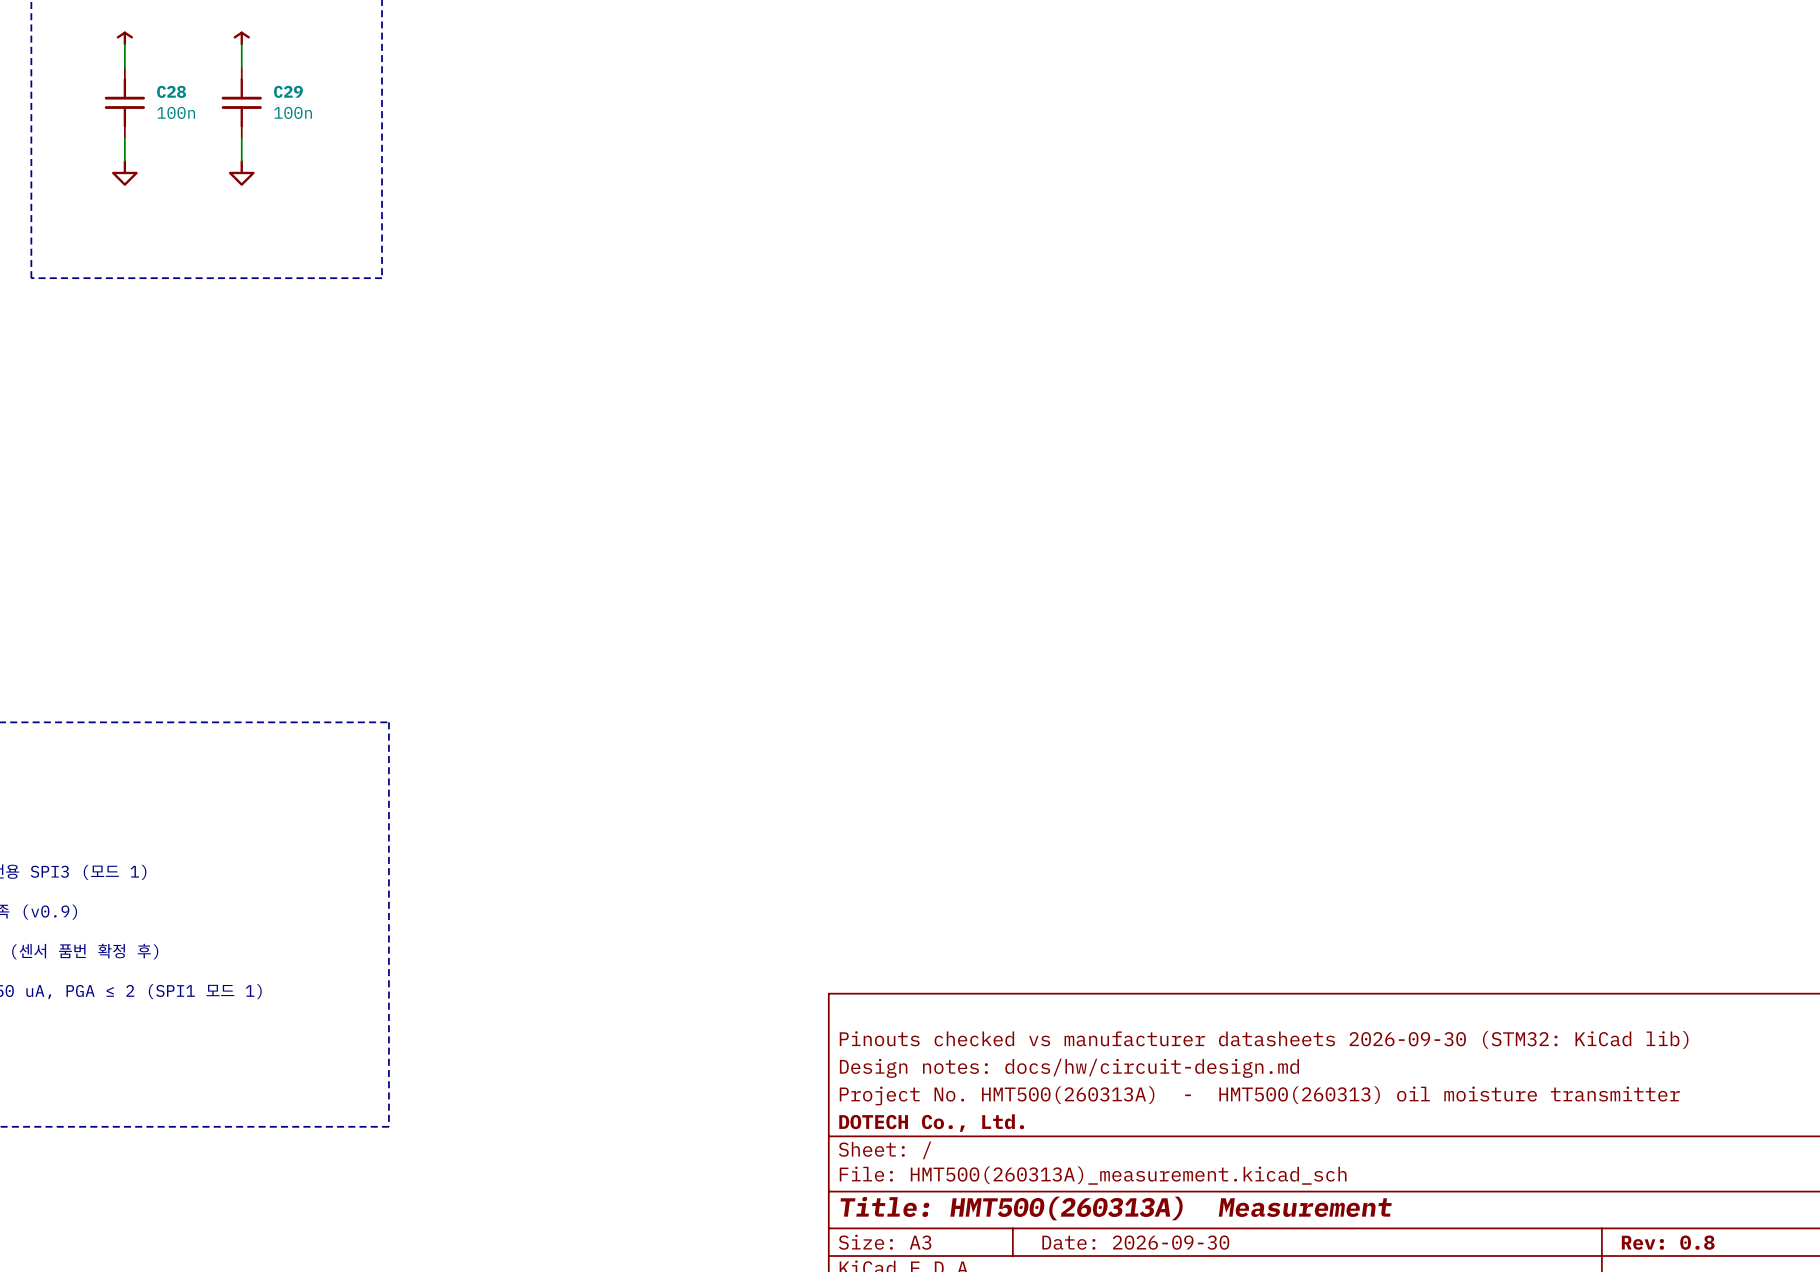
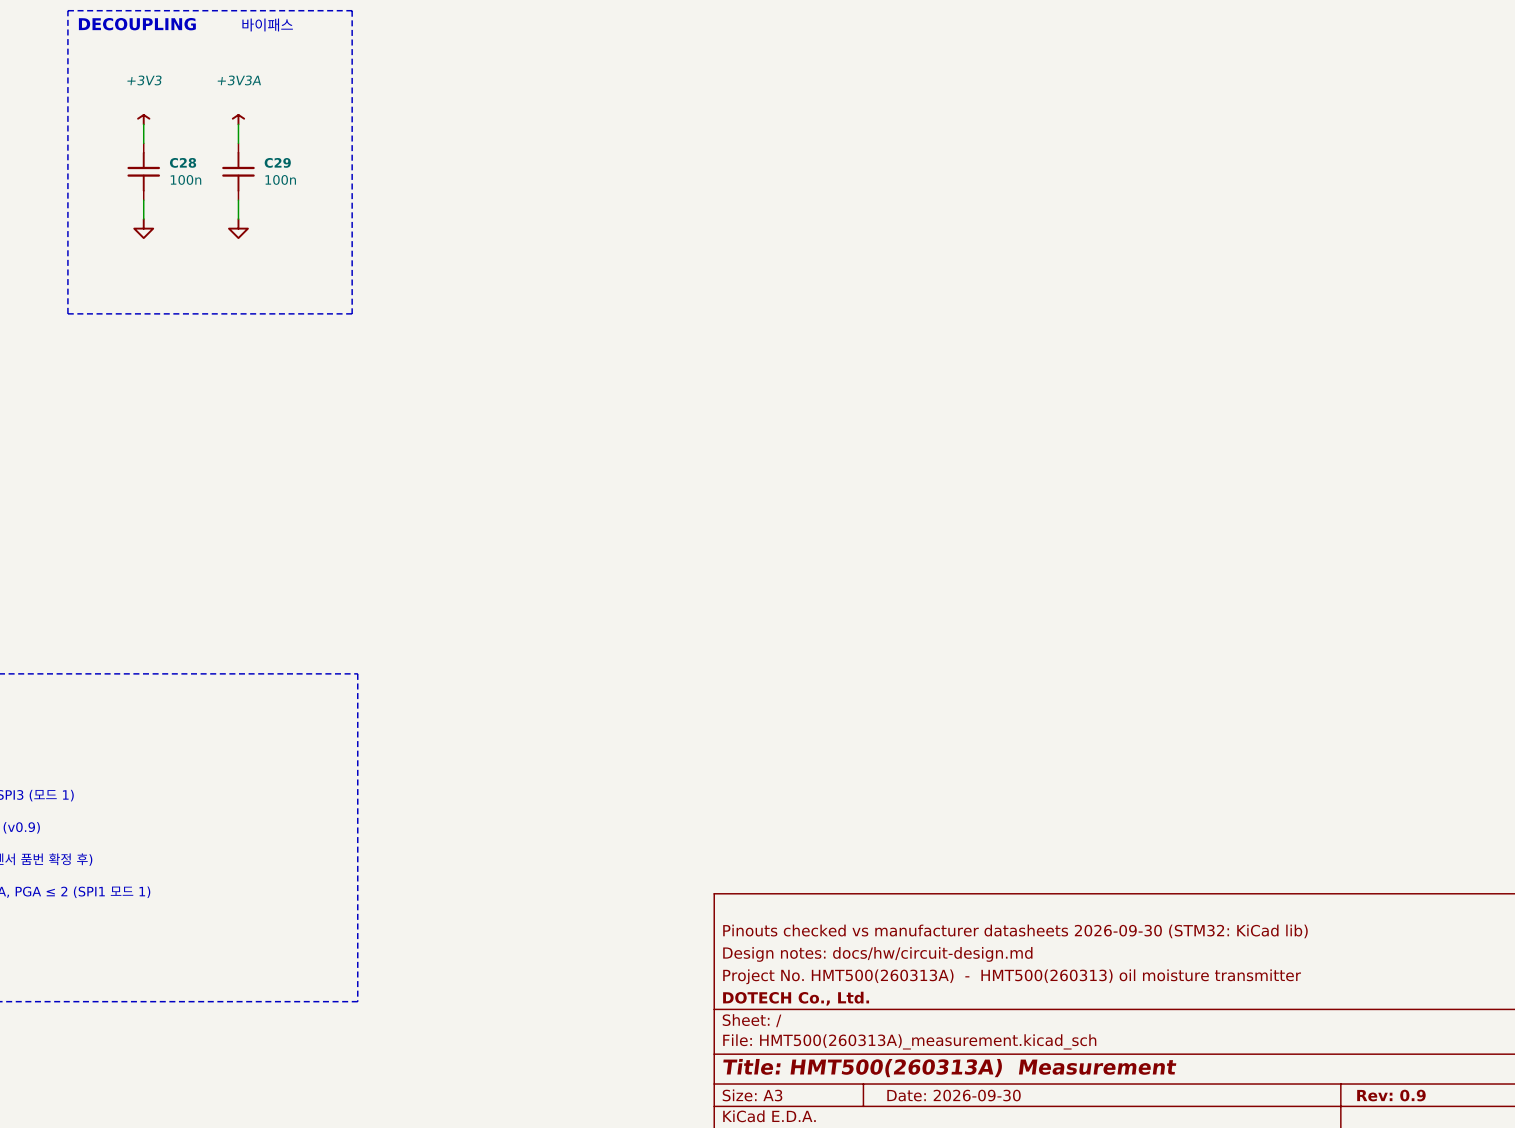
title block: Rev: 0.8 (1668, 1242) -> Rev: 0.9 (1391, 1095)

